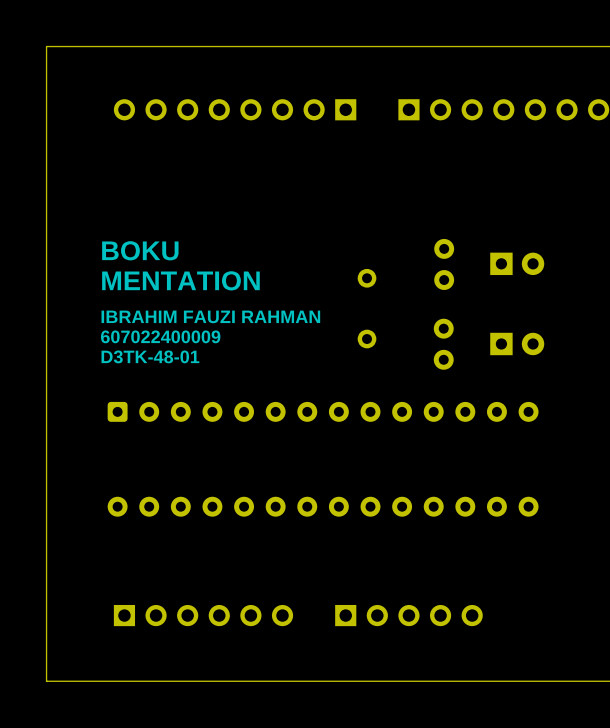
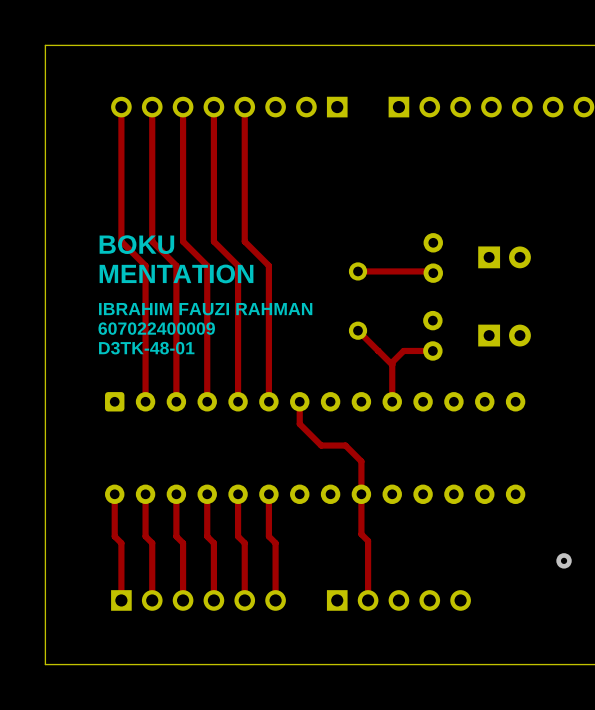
top track: none -> (121, 107) (121, 241) (145, 265) (145, 401)
top track: none -> (152, 107) (152, 241) (176, 265) (176, 401)
top track: none -> (183, 107) (183, 241) (207, 265) (207, 401)
top track: none -> (213, 107) (213, 241) (238, 265) (238, 401)
top track: none -> (244, 107) (244, 241) (268, 265) (268, 401)
top track: none -> (358, 271) (431, 271) (433, 273)
top track: none -> (358, 330) (378, 350)
top track: none -> (378, 350) (392, 364)
top track: none -> (432, 350) (403, 350) (392, 362) (392, 401)
top track: none -> (299, 401) (299, 424) (321, 445) (345, 445) (361, 461) (361, 534) (368, 540) (368, 600)
top track: none -> (114, 494) (114, 536) (121, 543) (121, 600)
top track: none -> (145, 494) (145, 536)
top track: none -> (176, 494) (176, 536) (183, 543) (183, 600)
top track: none -> (207, 494) (207, 536) (213, 543) (213, 600)
top track: none -> (238, 494) (238, 536) (244, 543) (244, 600)
top track: none -> (268, 494) (268, 536) (275, 543) (275, 600)
top track: none -> (145, 536) (152, 543)
top track: none -> (152, 542) (152, 600)
via: none -> (564, 560)

